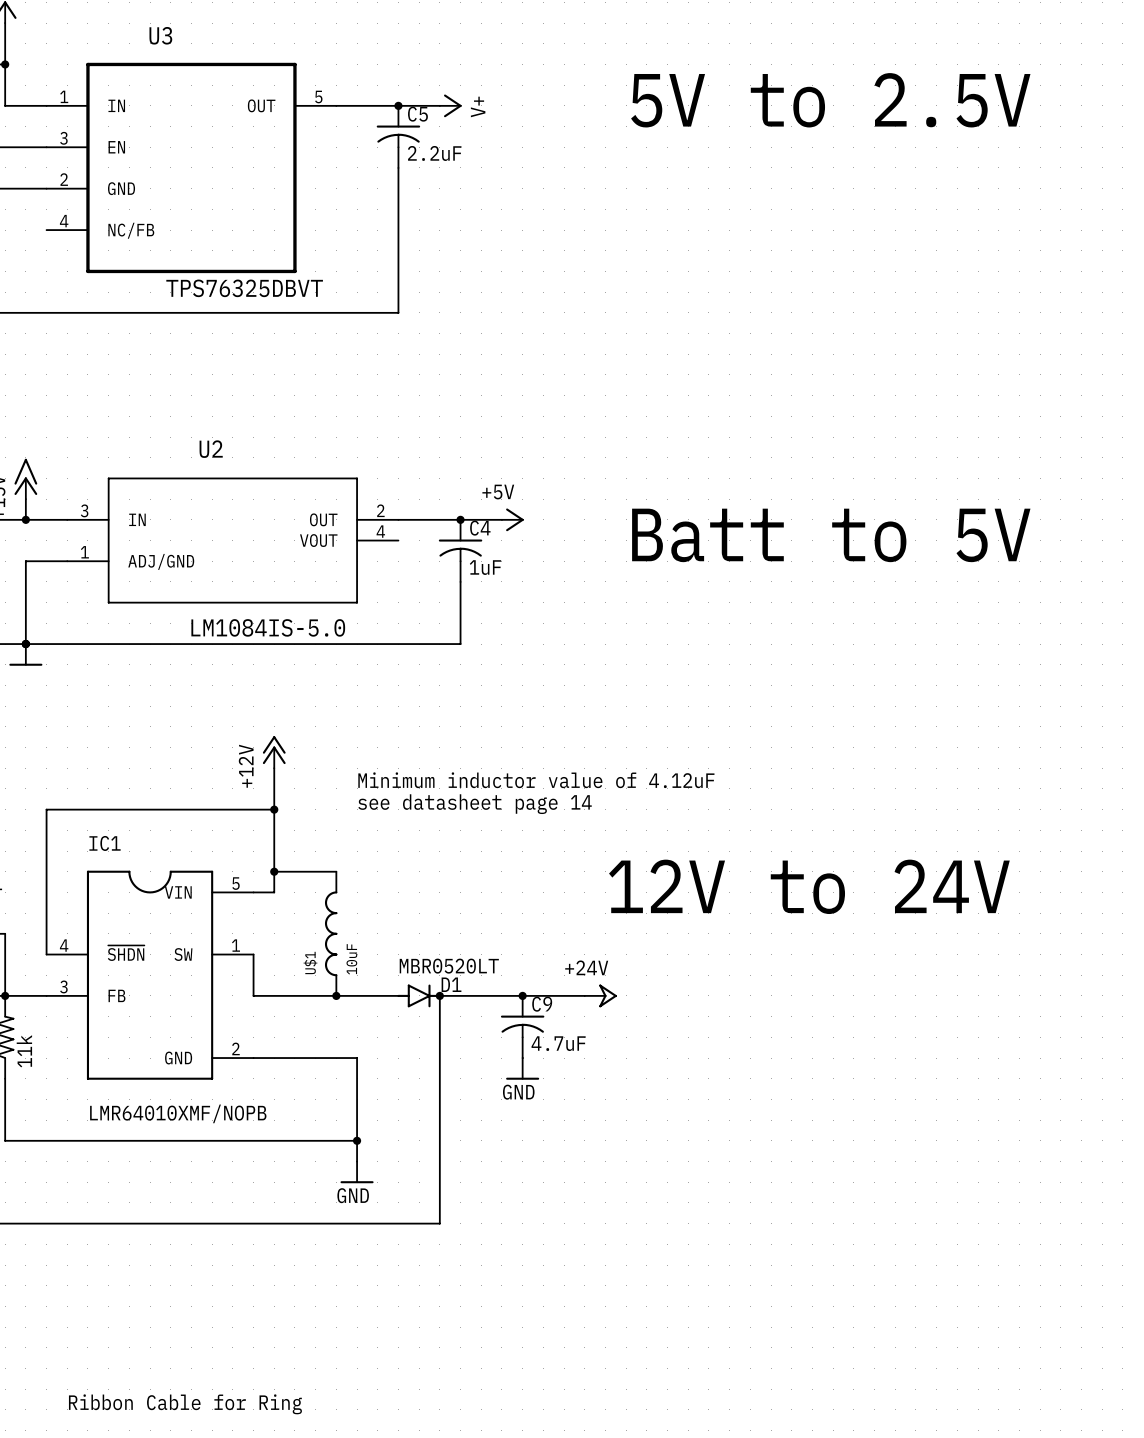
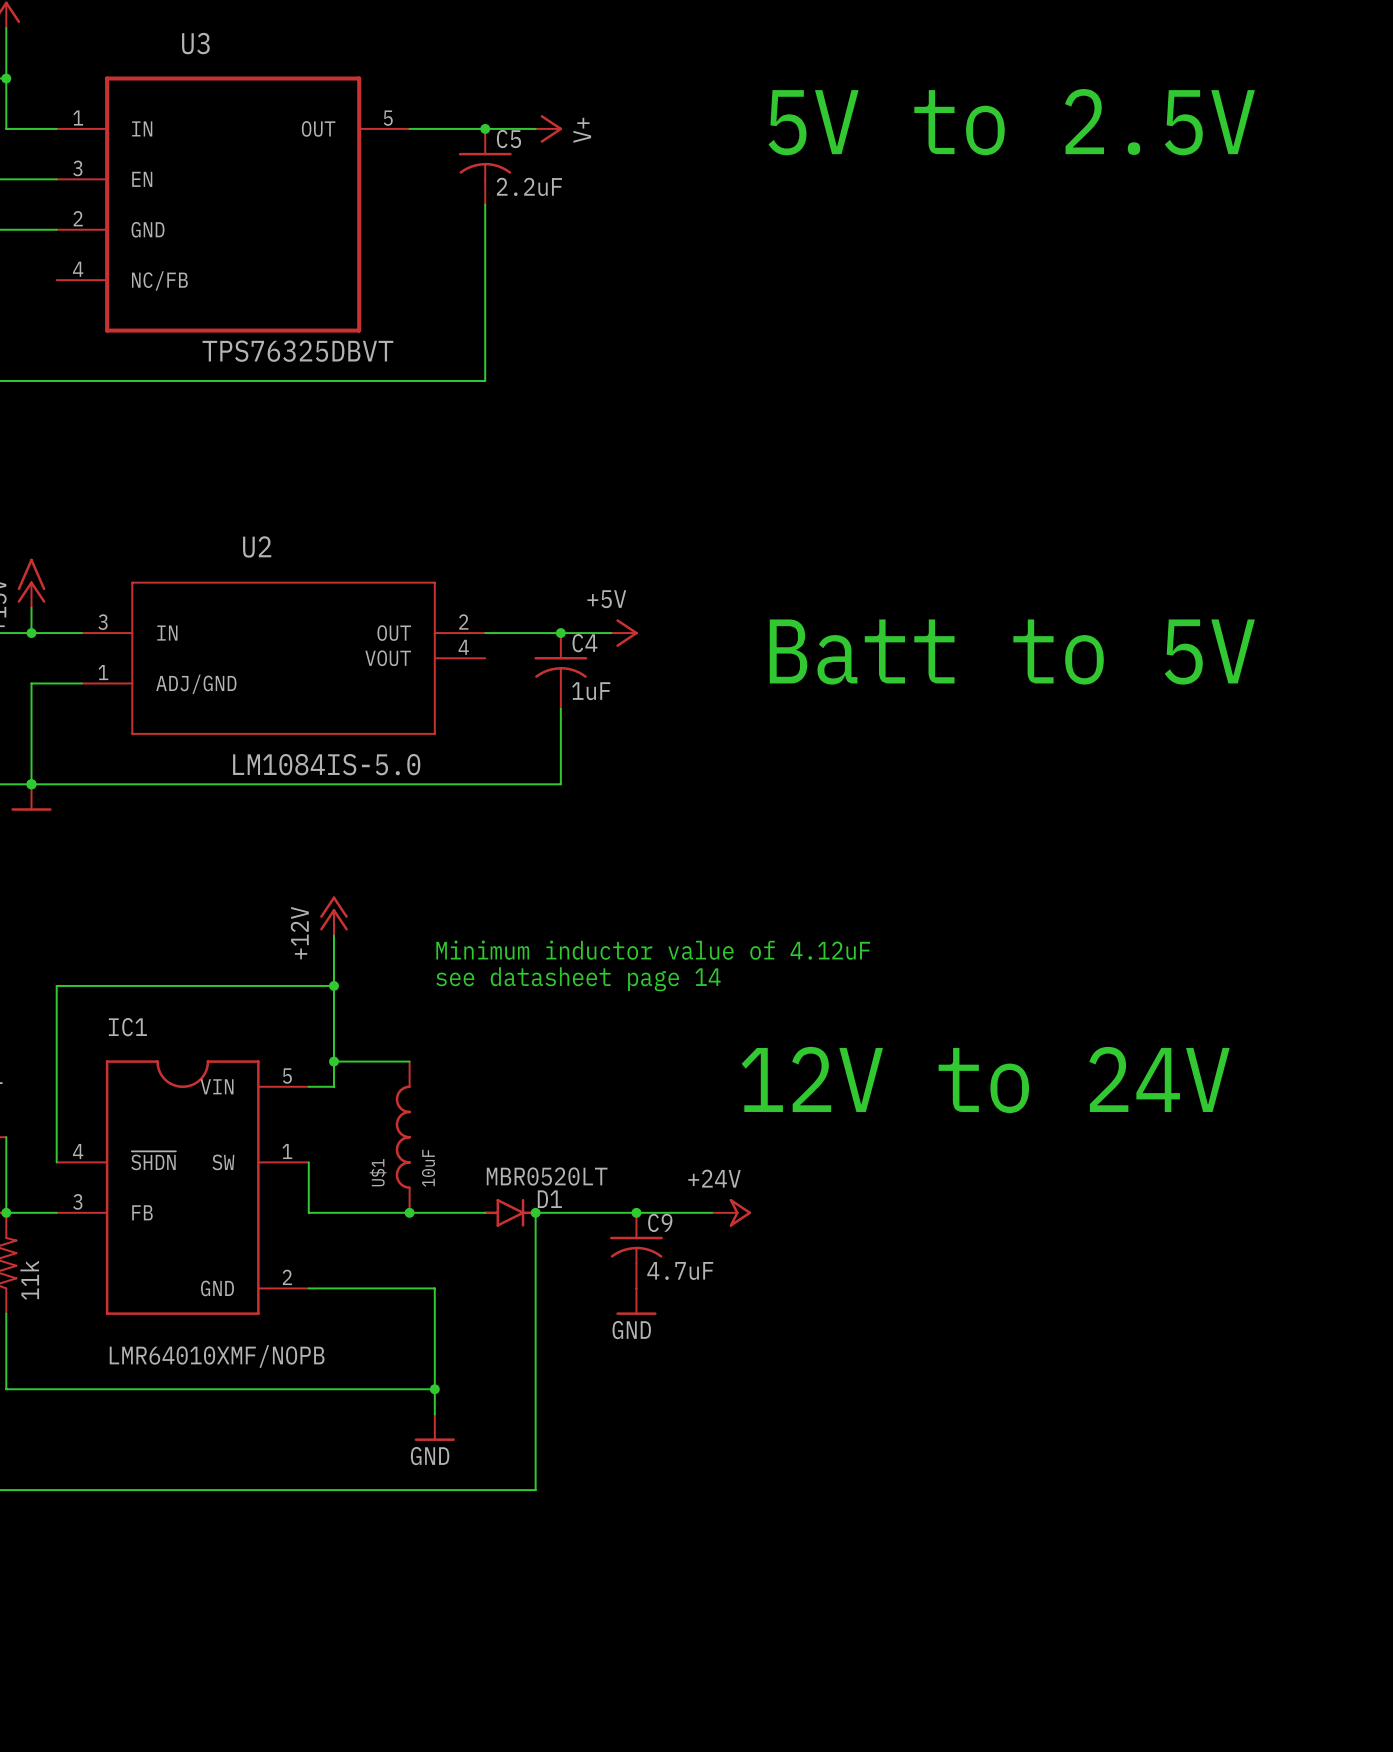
text: Ribbon Cable for Ring (185, 1404) -> none

